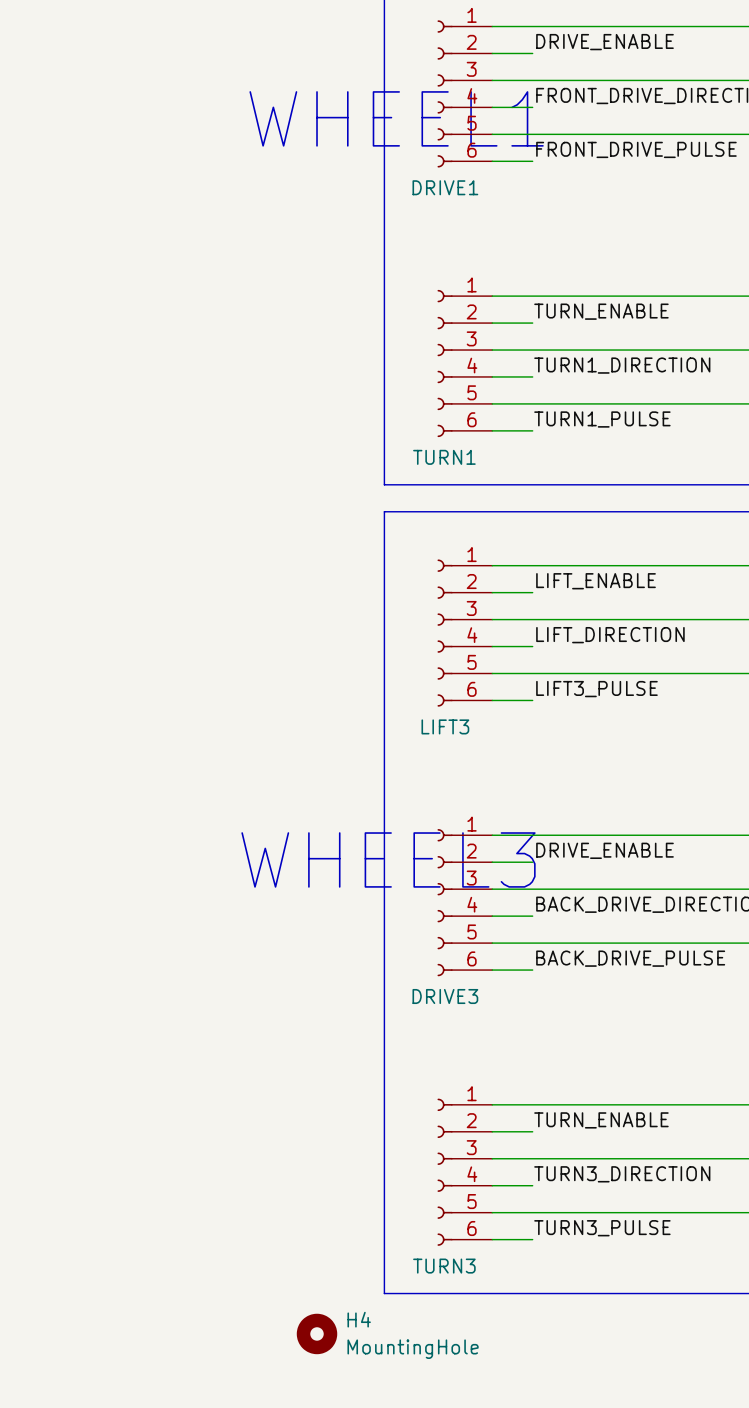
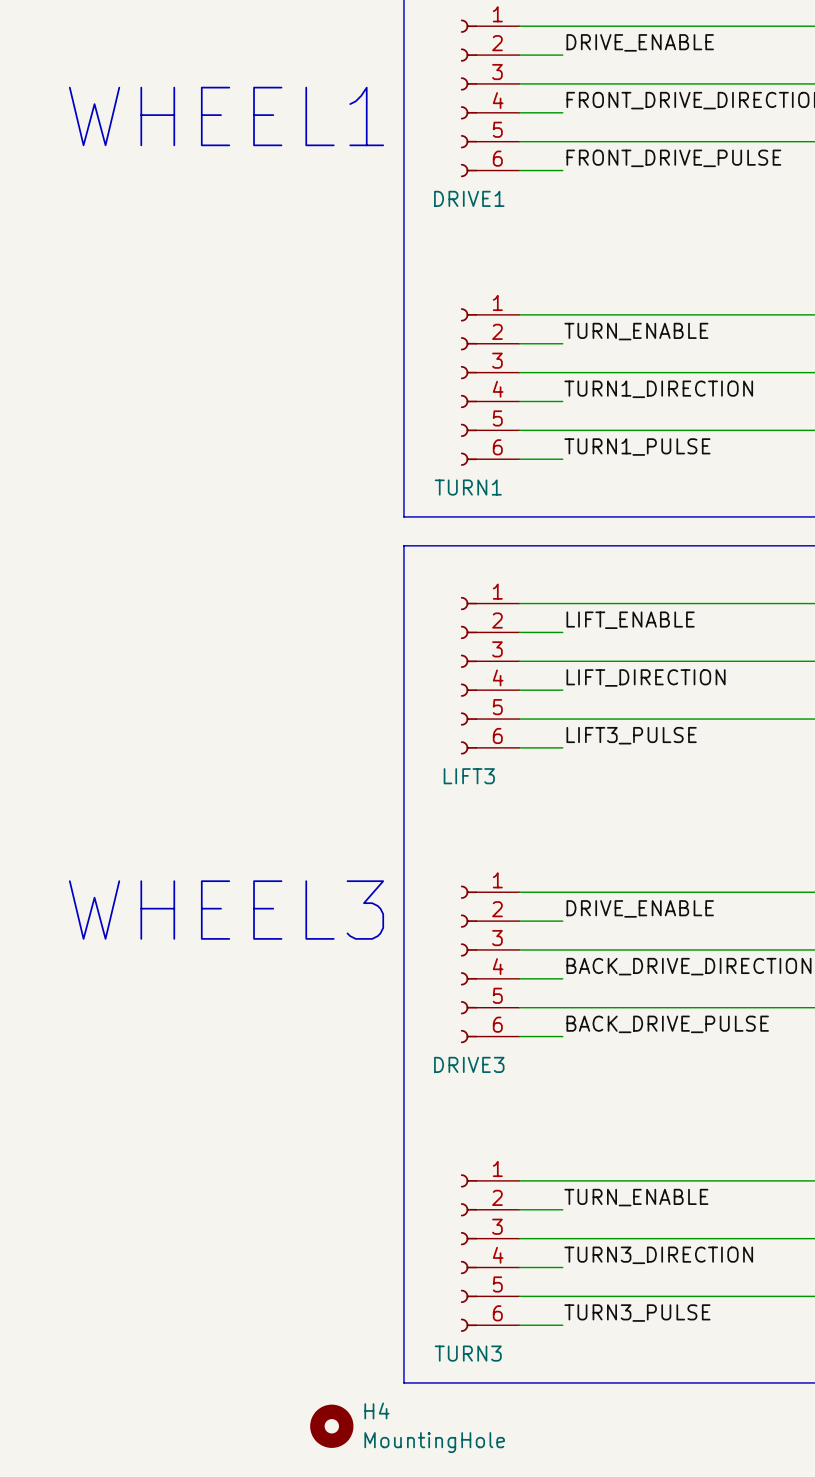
text position: WHEEL1 (396, 118) -> WHEEL1 (226, 116)
text position: WHEEL3 (388, 859) -> WHEEL3 (226, 910)

